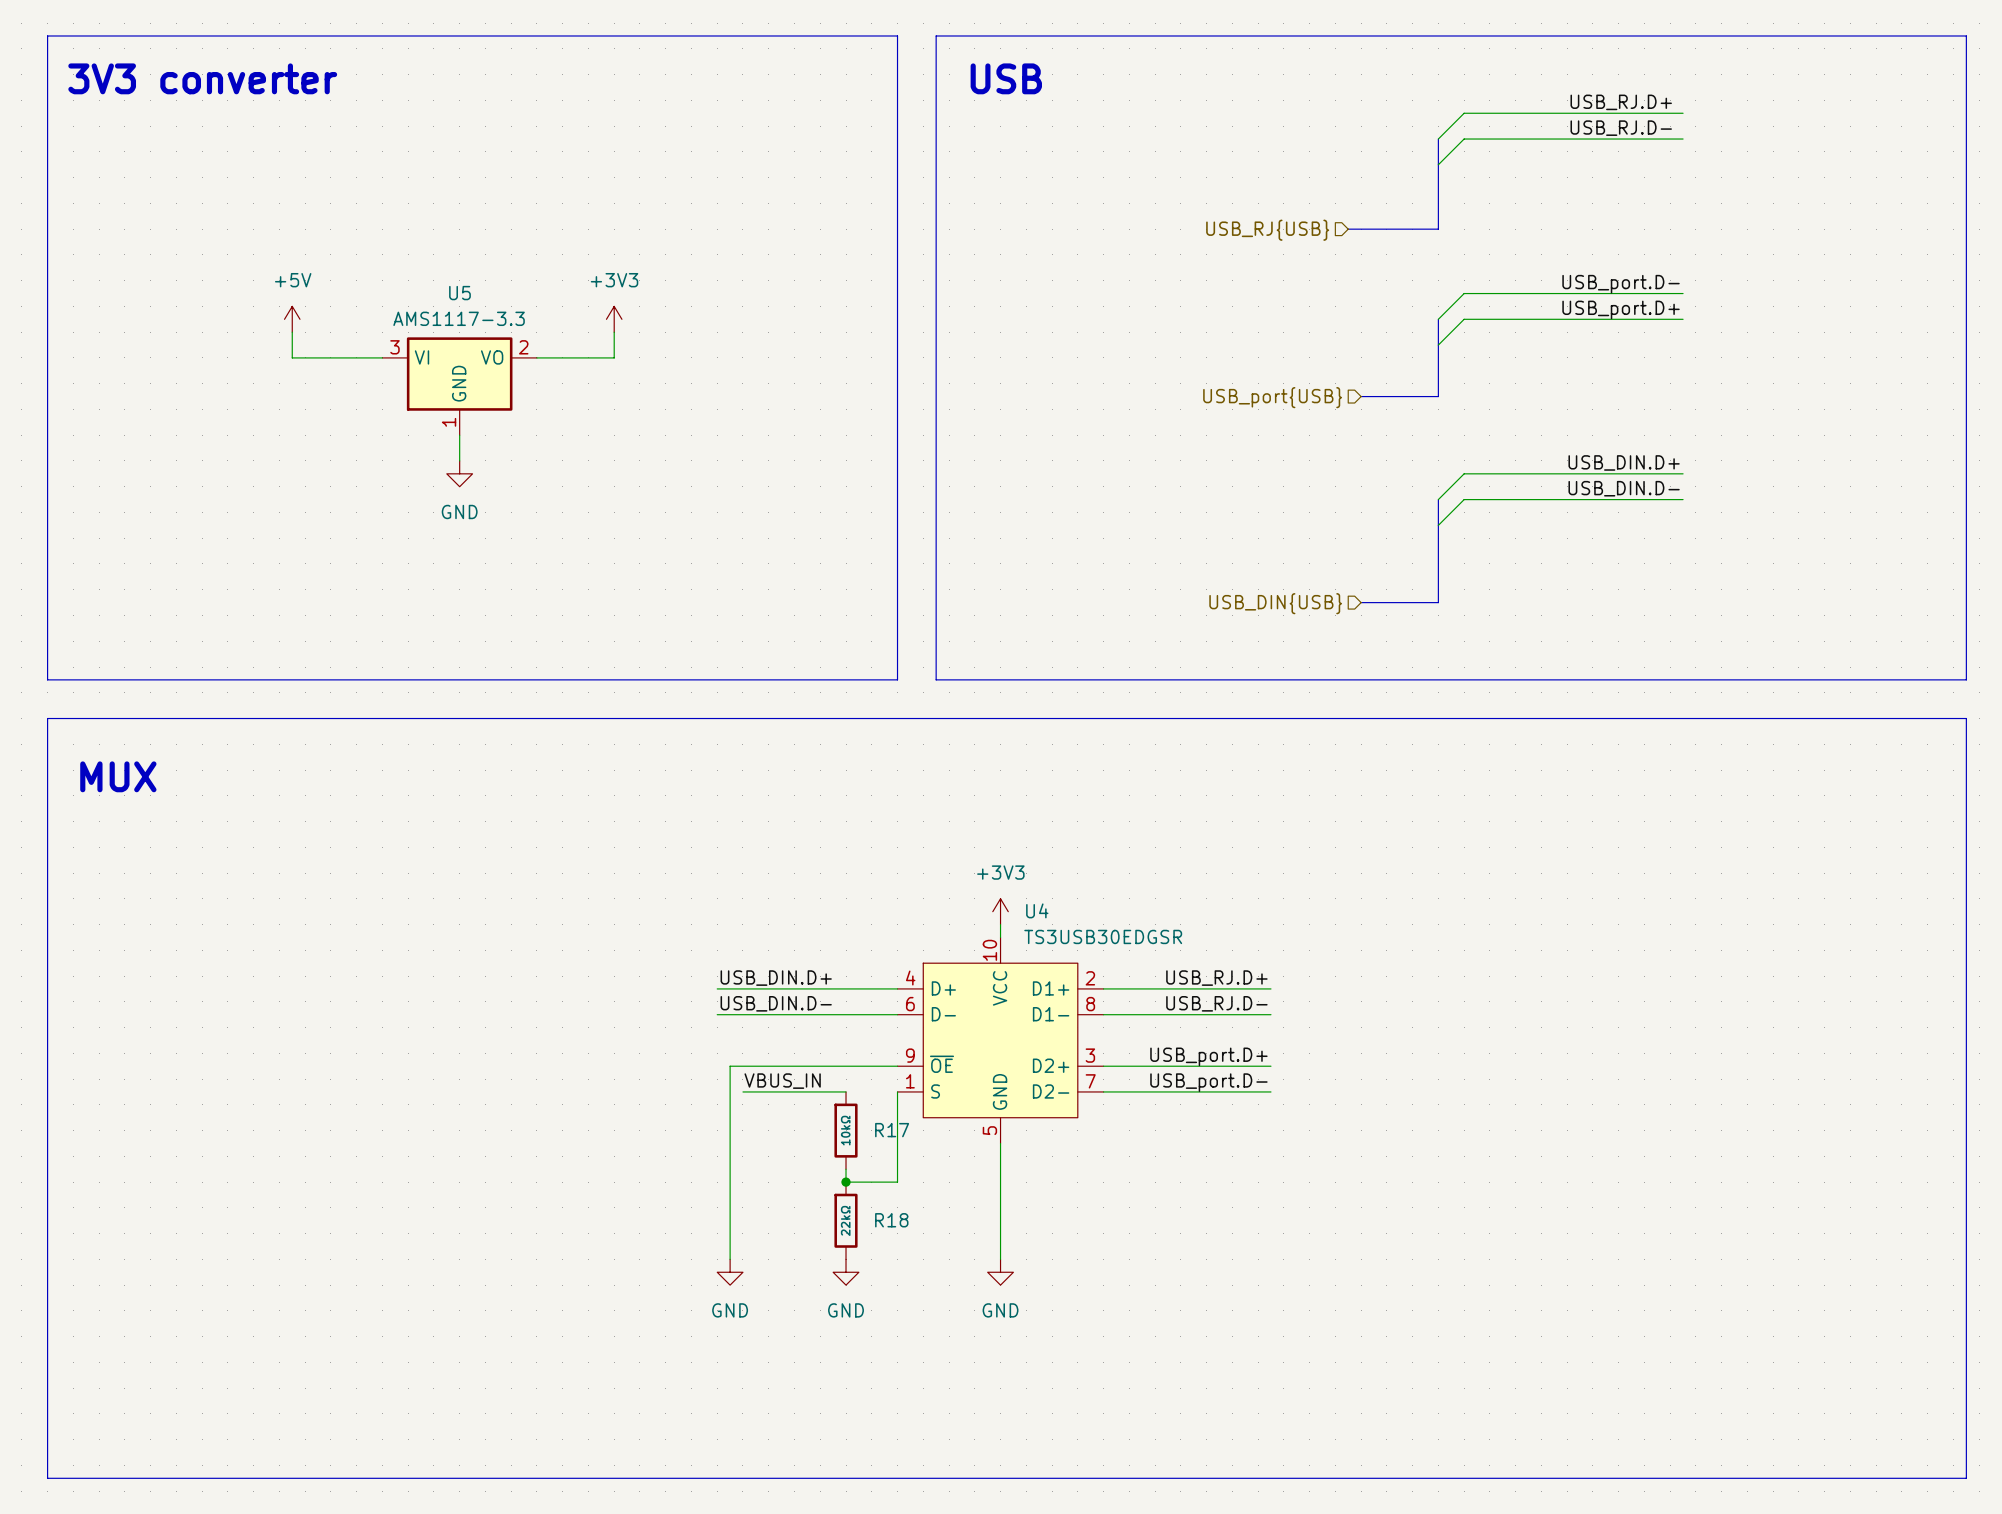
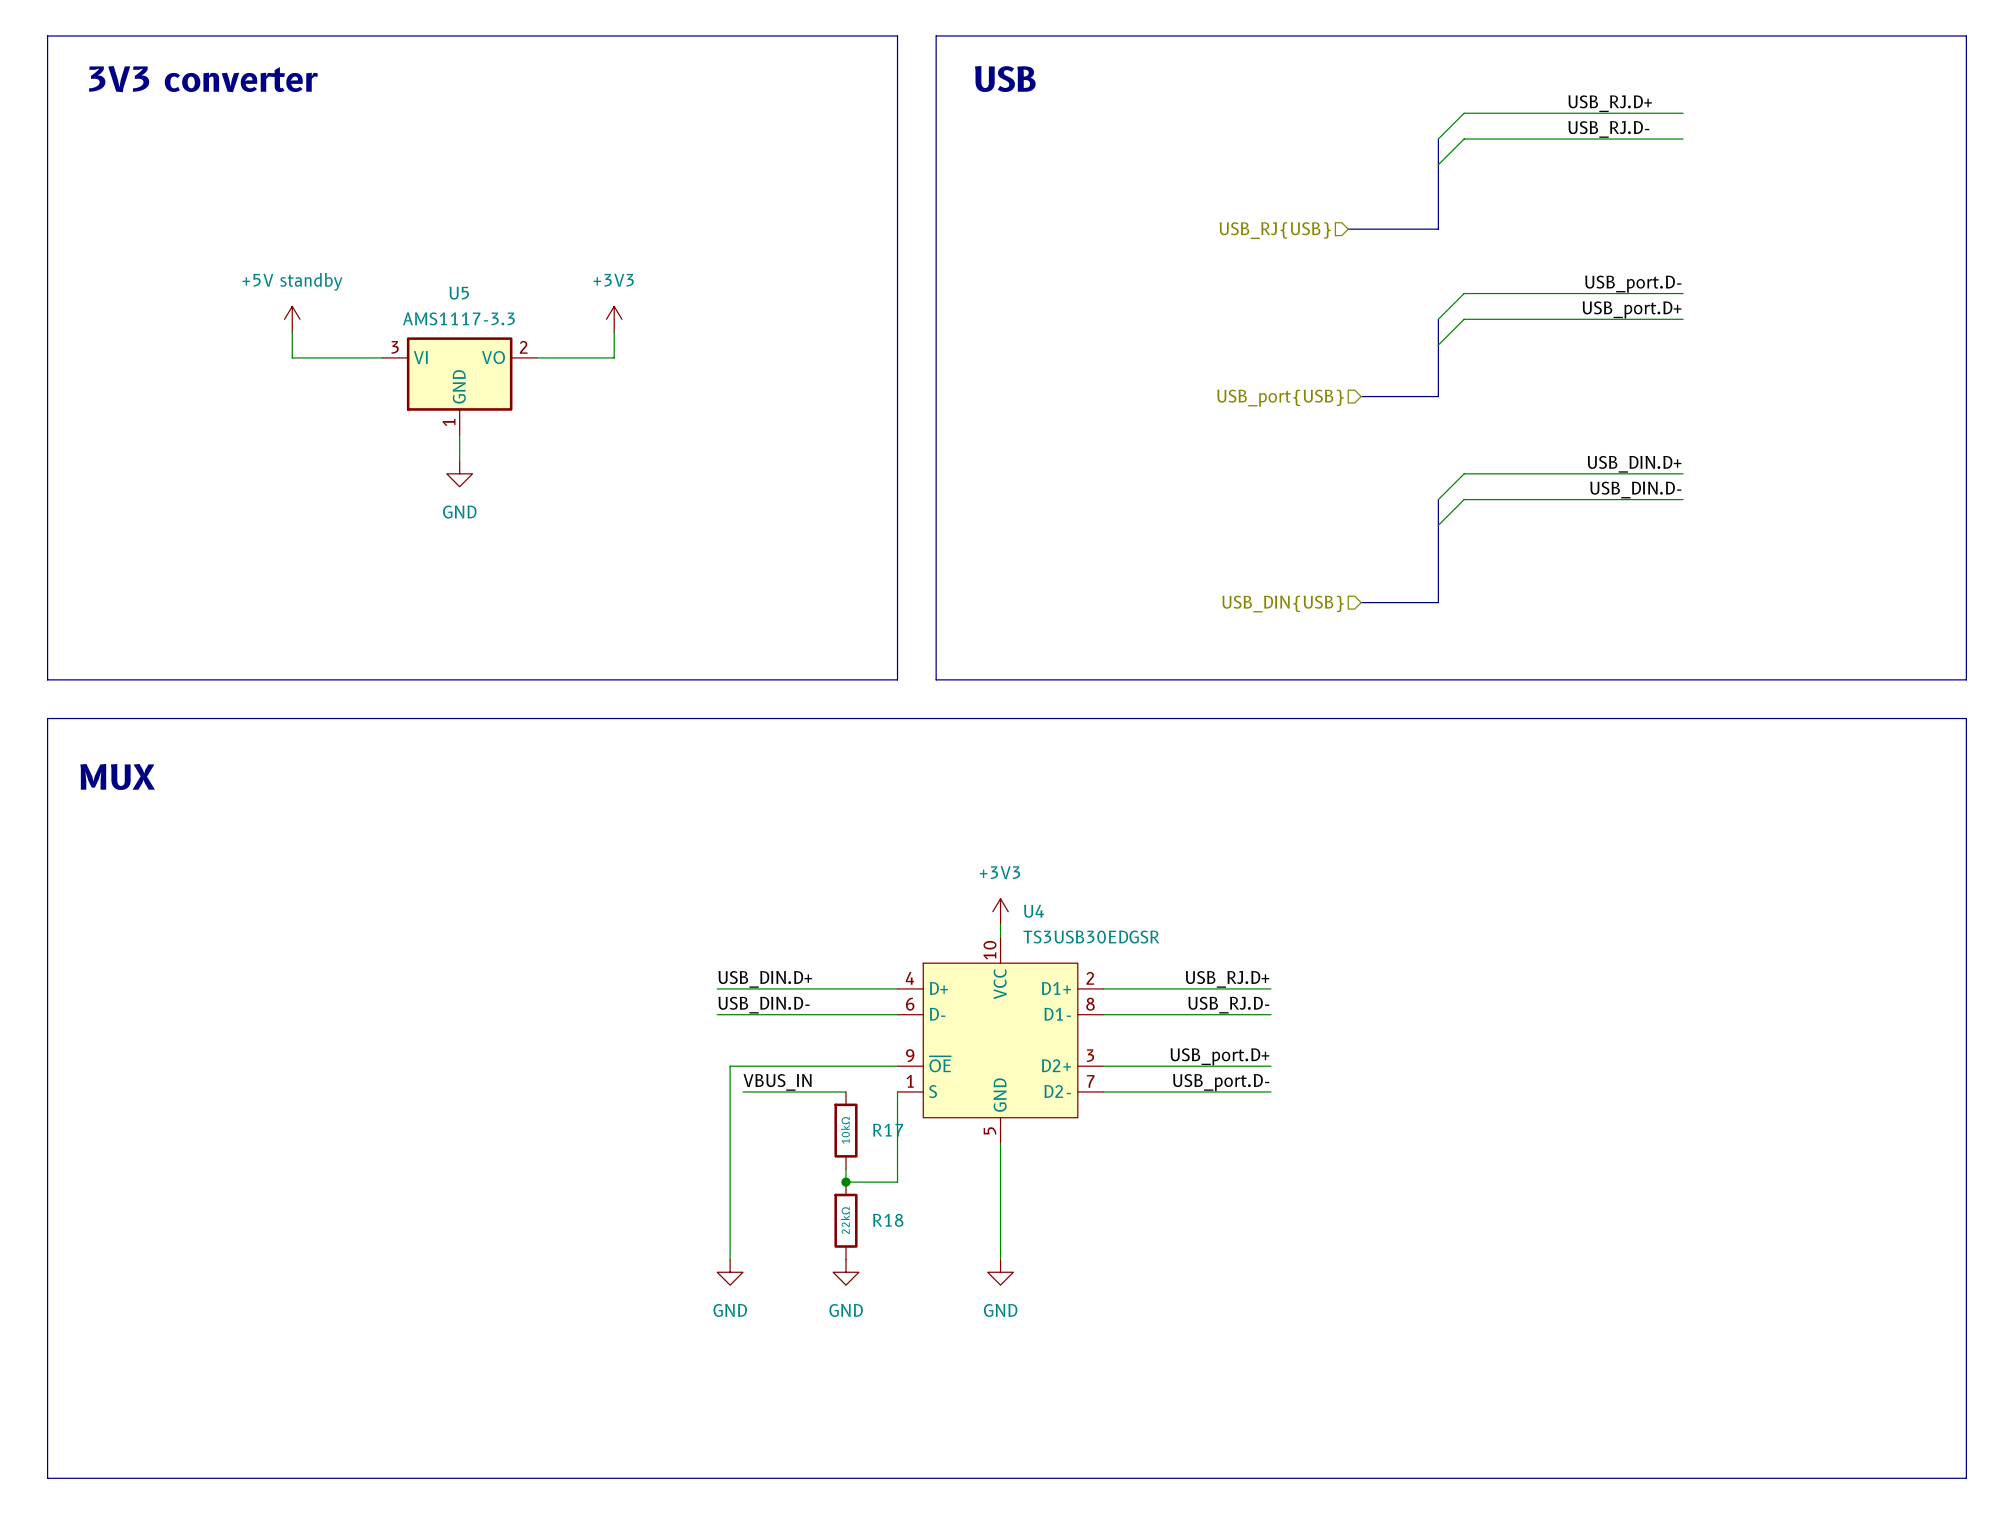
power symbol: +5V (292, 319) -> +5V standby (292, 319)

